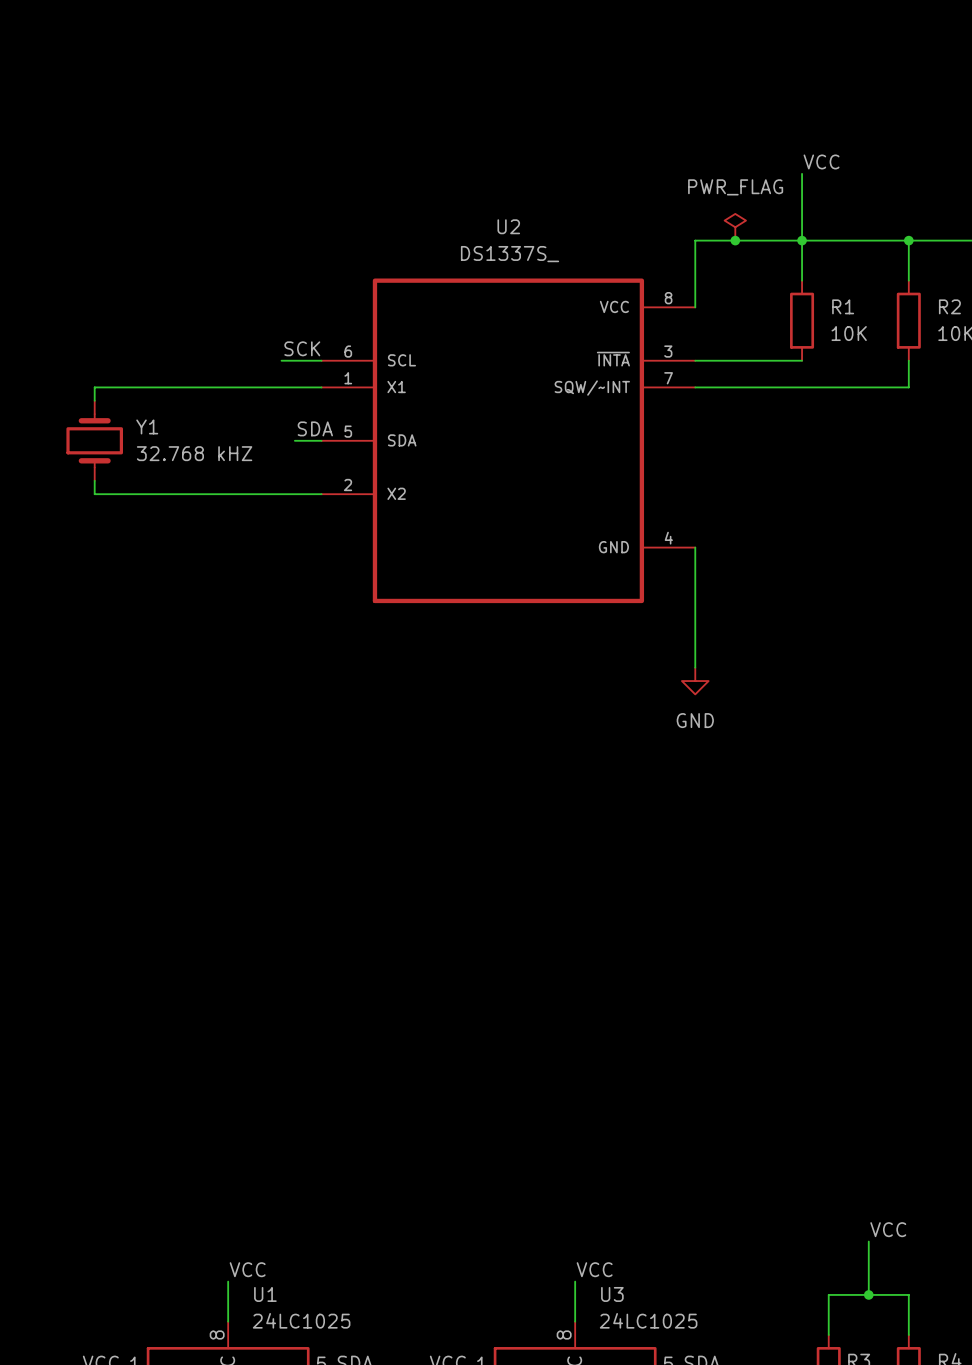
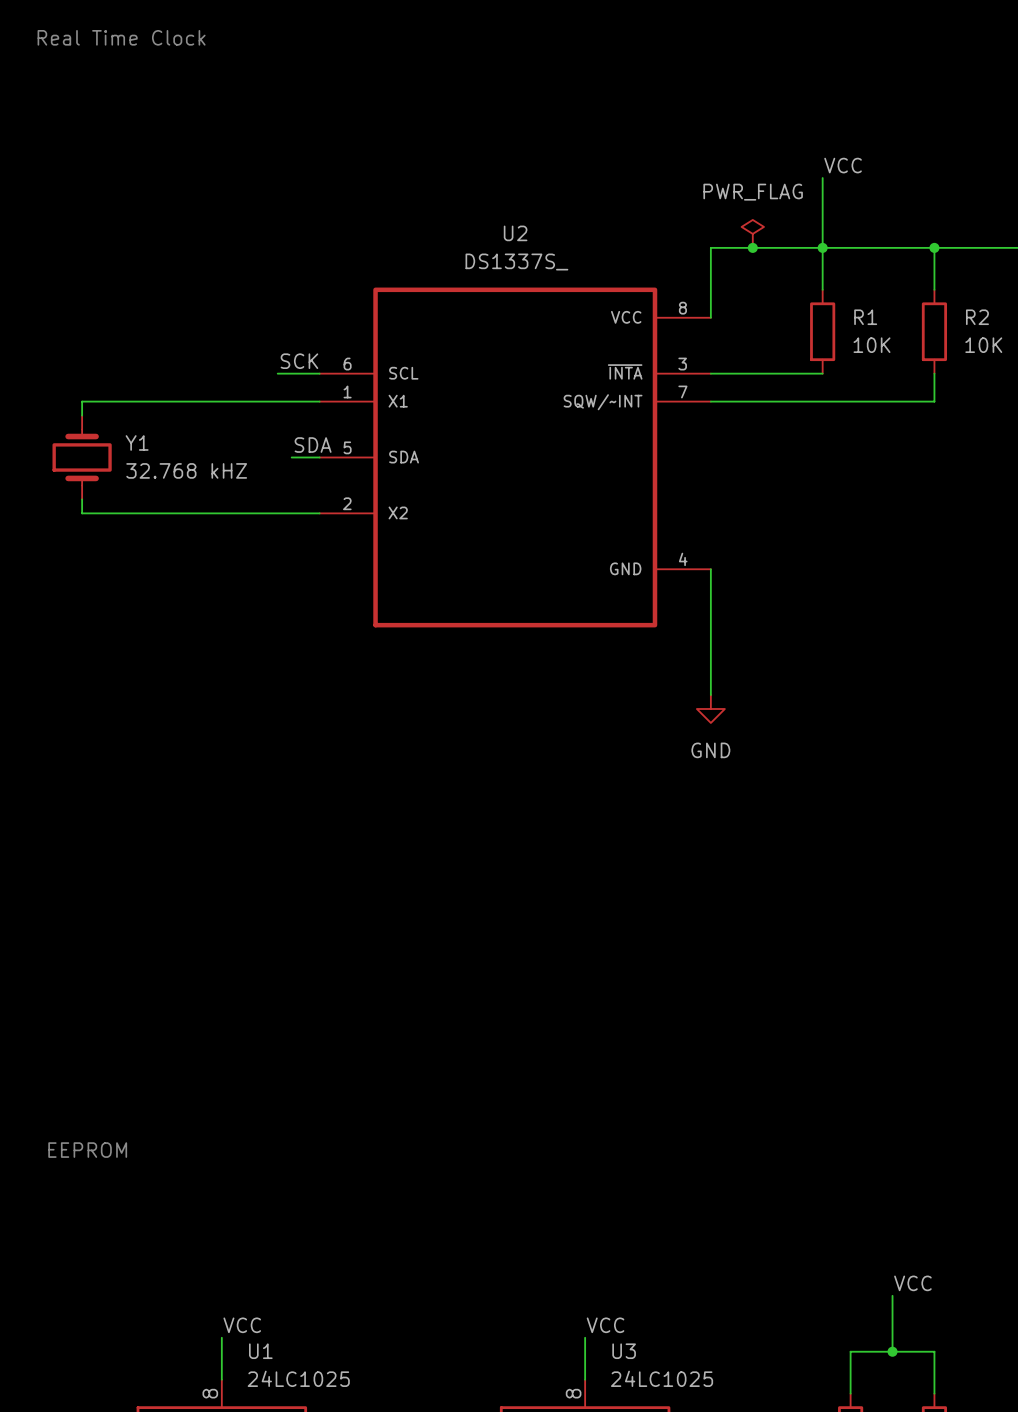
text: none -> Real Time Clock (121, 37)
text: none -> EEPROM (87, 1150)

